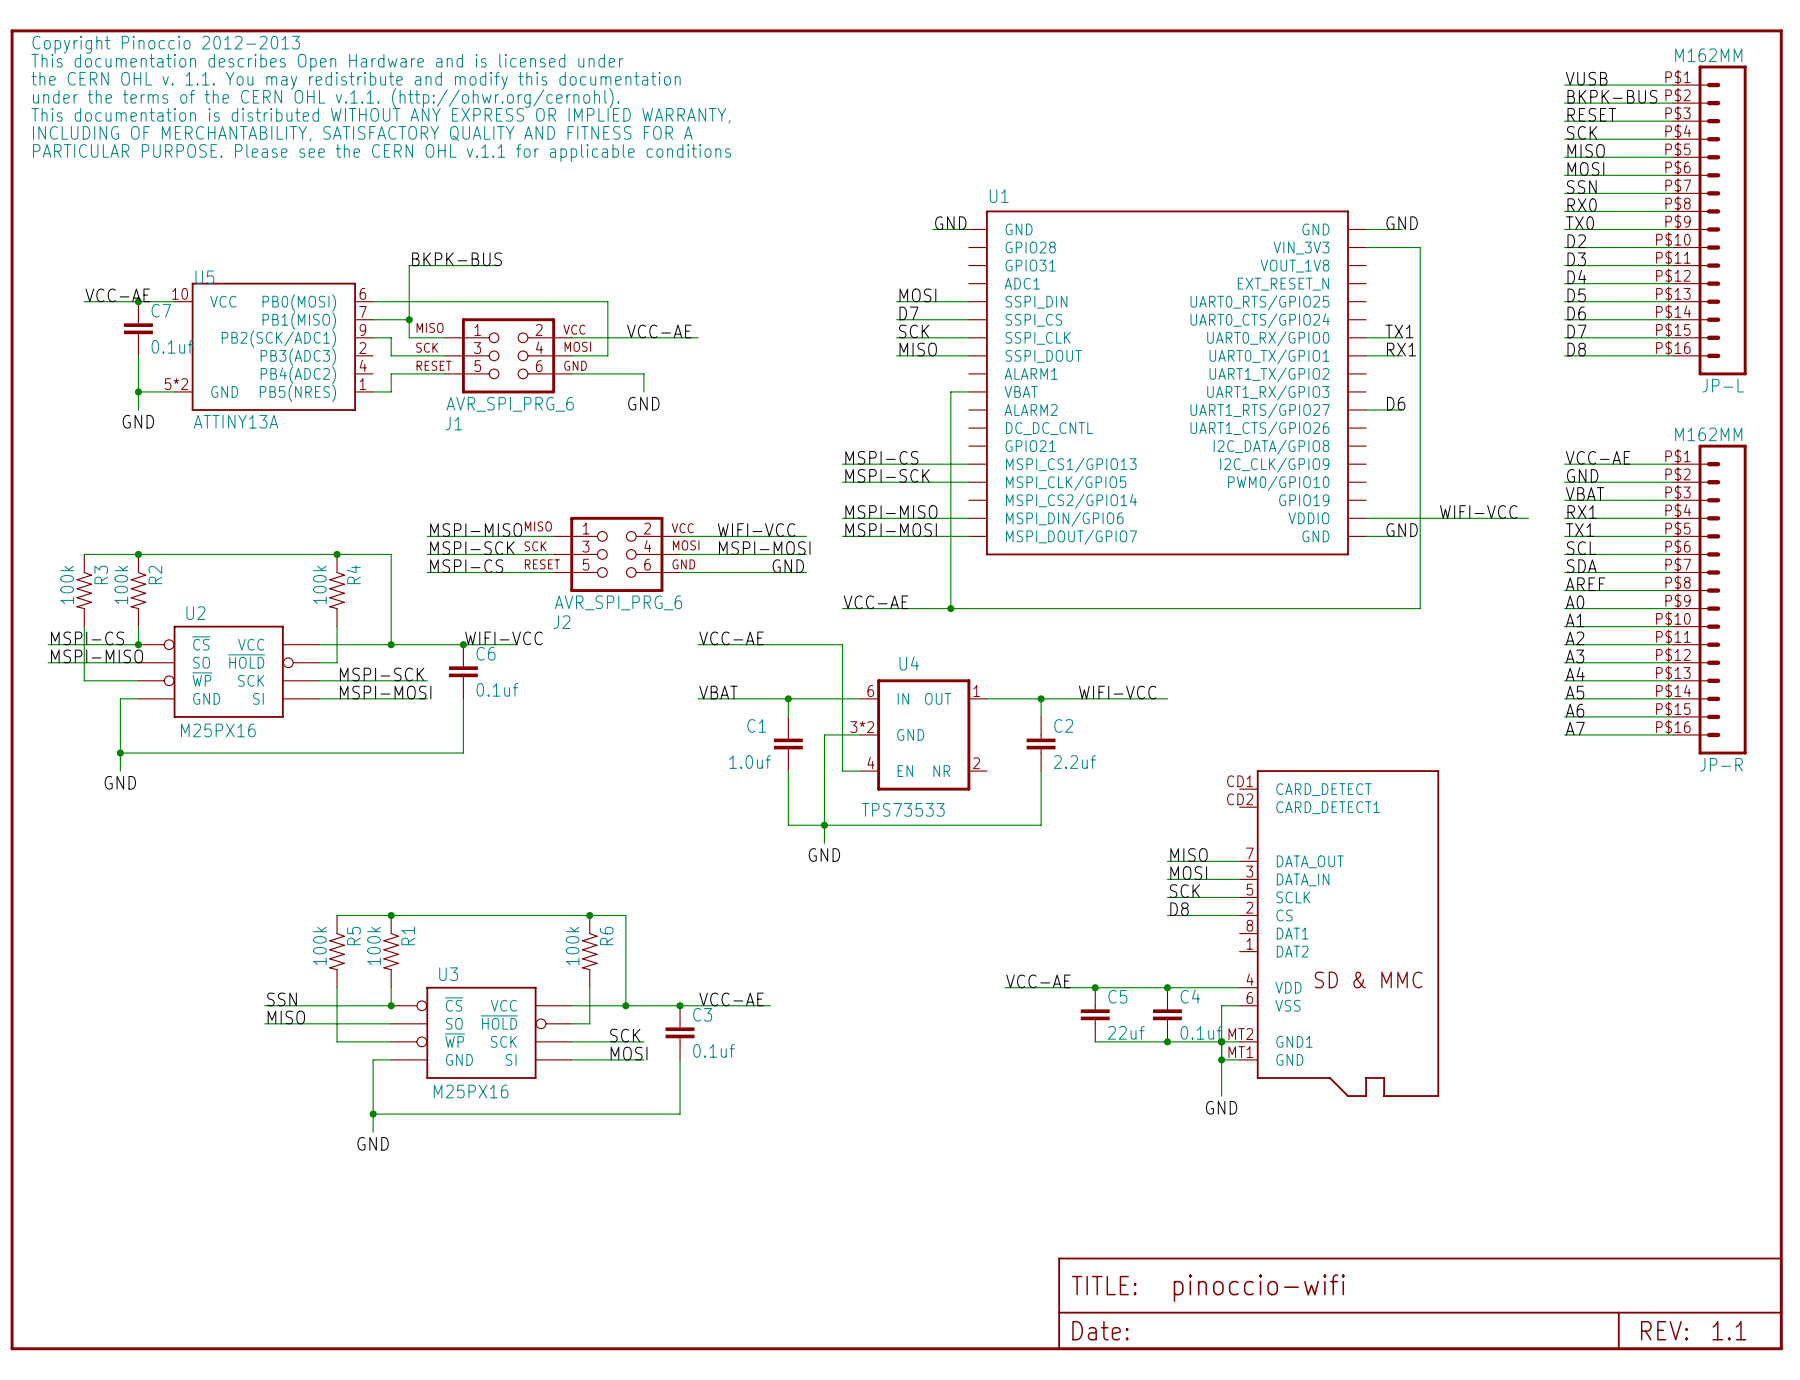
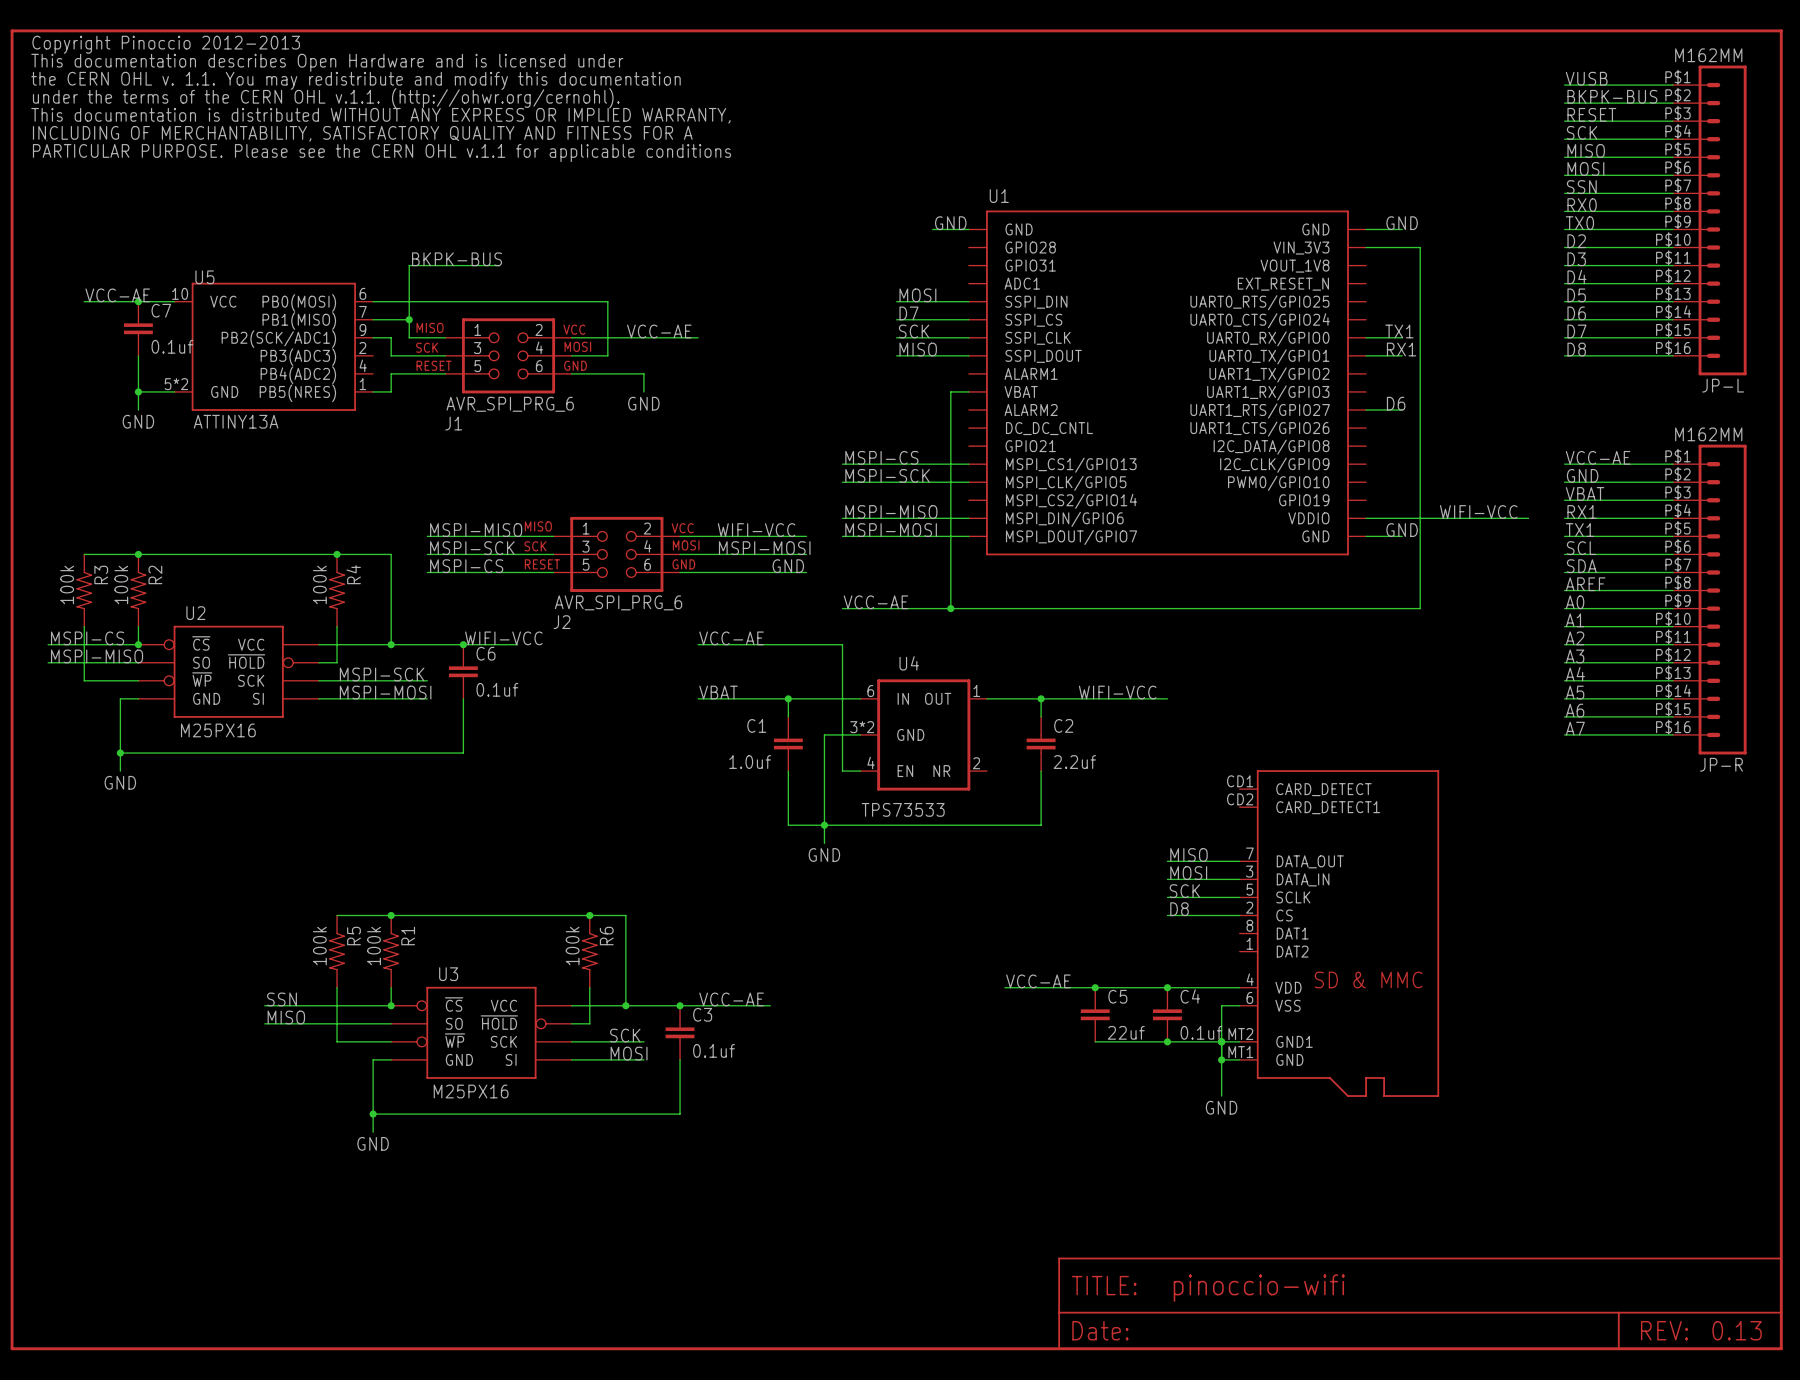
text: 1.1 (1729, 1330) -> 0.13 (1737, 1330)

